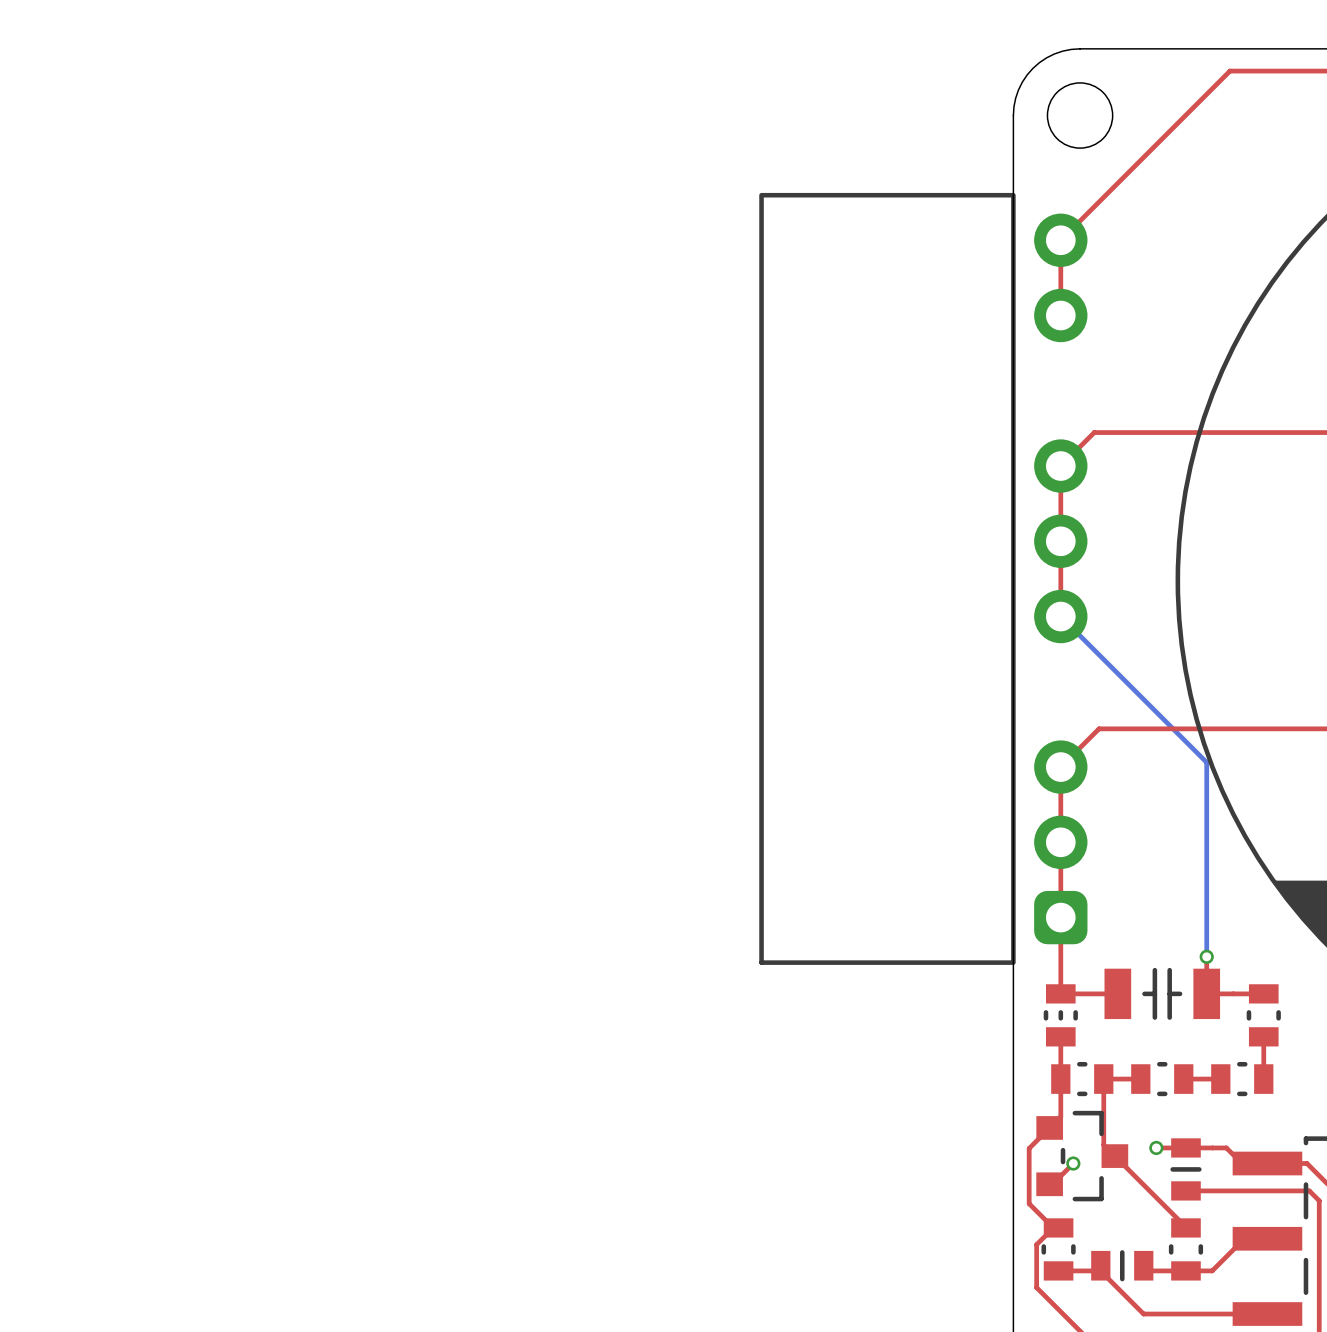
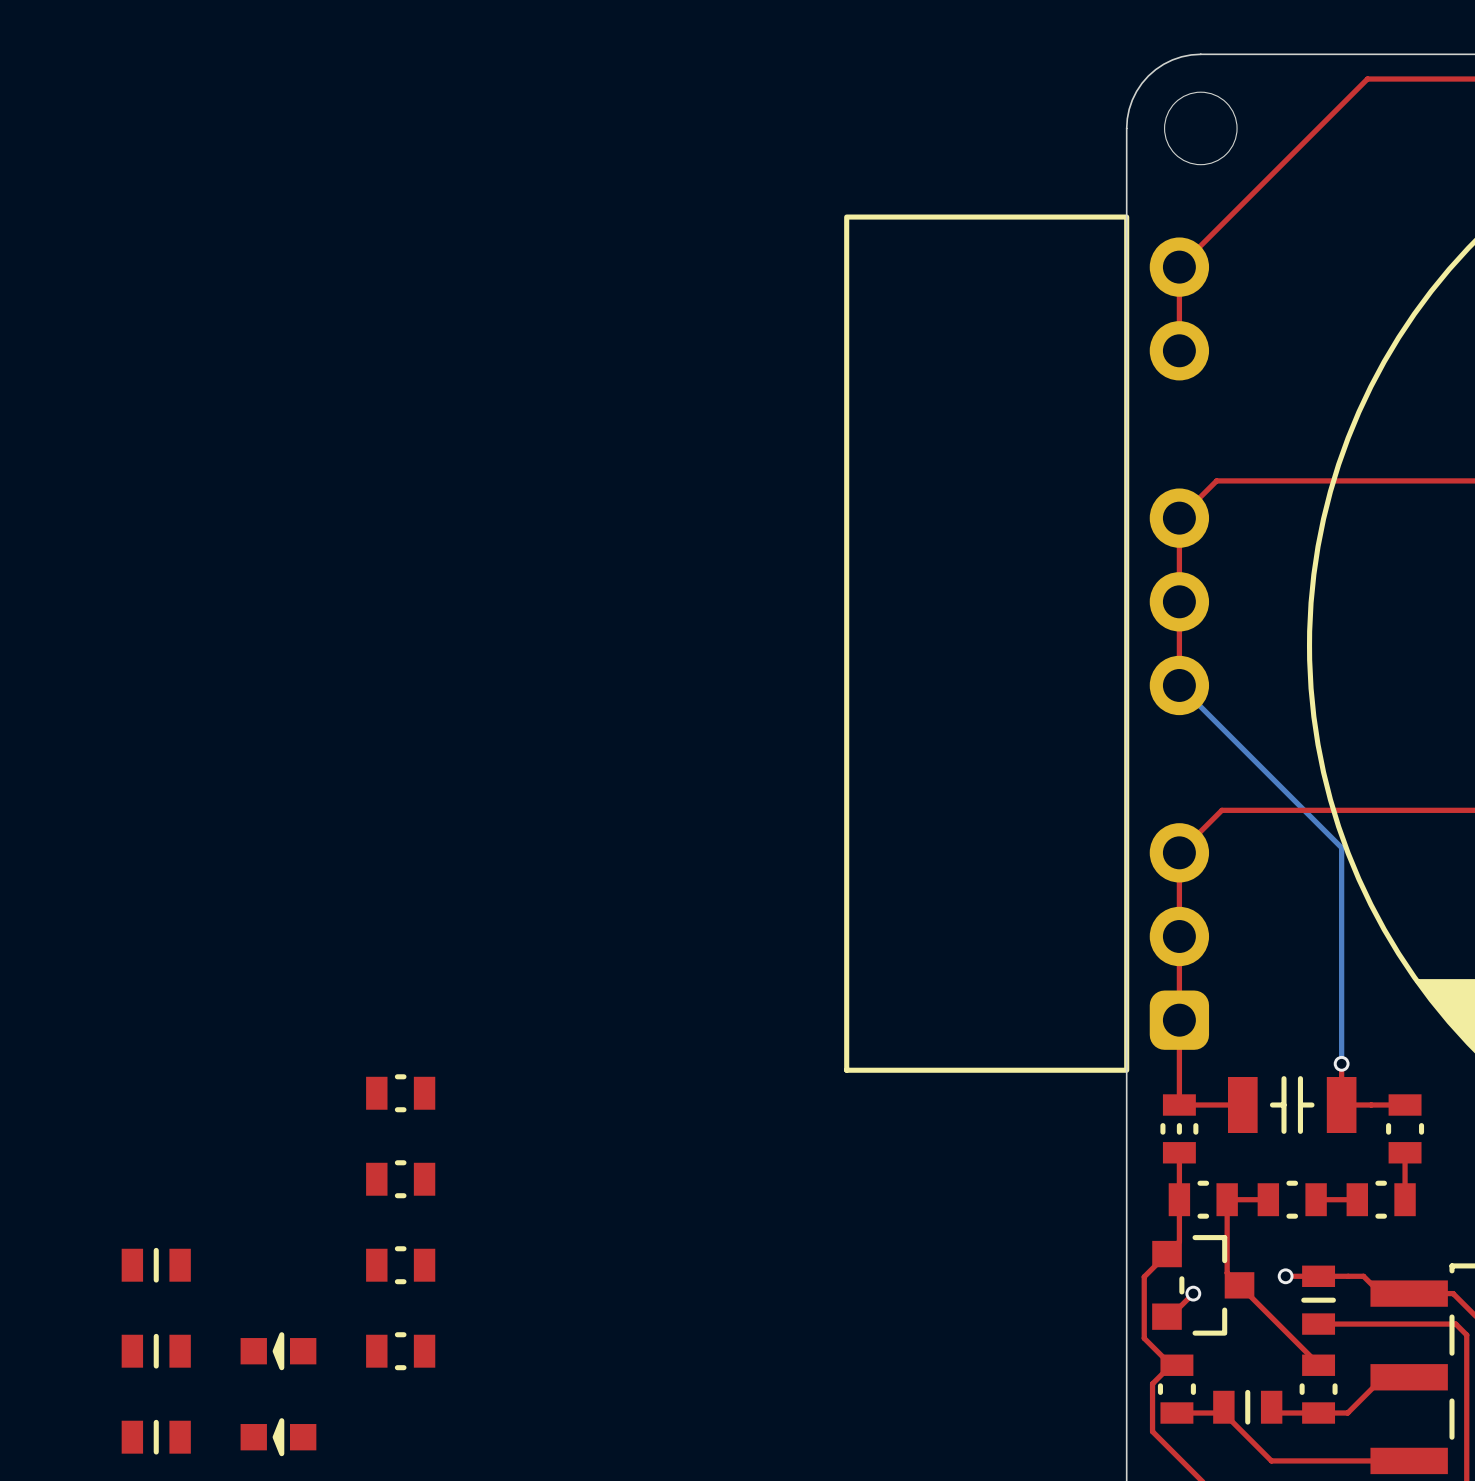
part: none -> (400, 1093)
part: none -> (400, 1179)
part: none -> (156, 1265)
part: none -> (400, 1265)
part: none -> (156, 1351)
part: none -> (278, 1351)
part: none -> (400, 1351)
part: none -> (156, 1437)
part: none -> (278, 1437)

